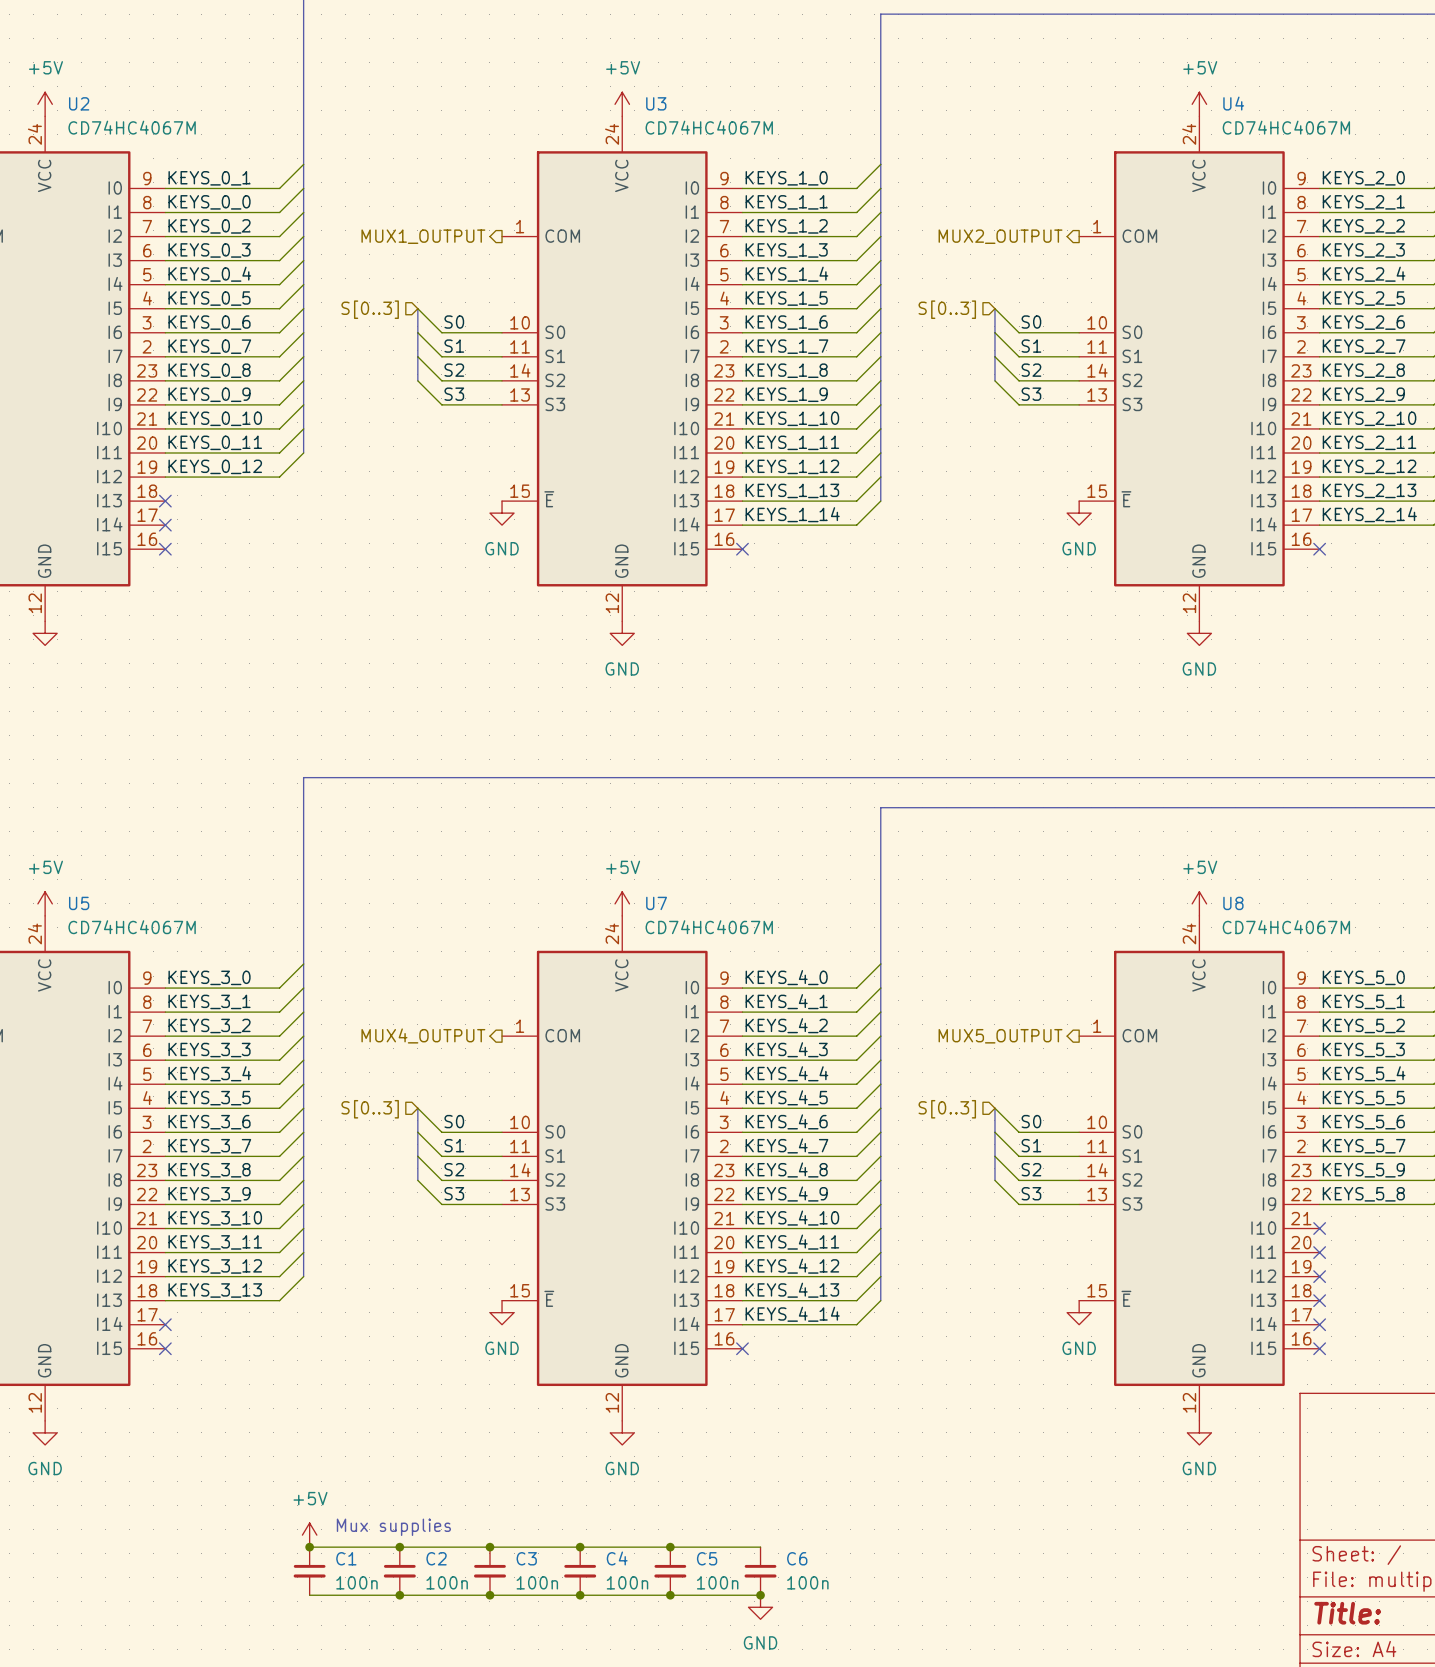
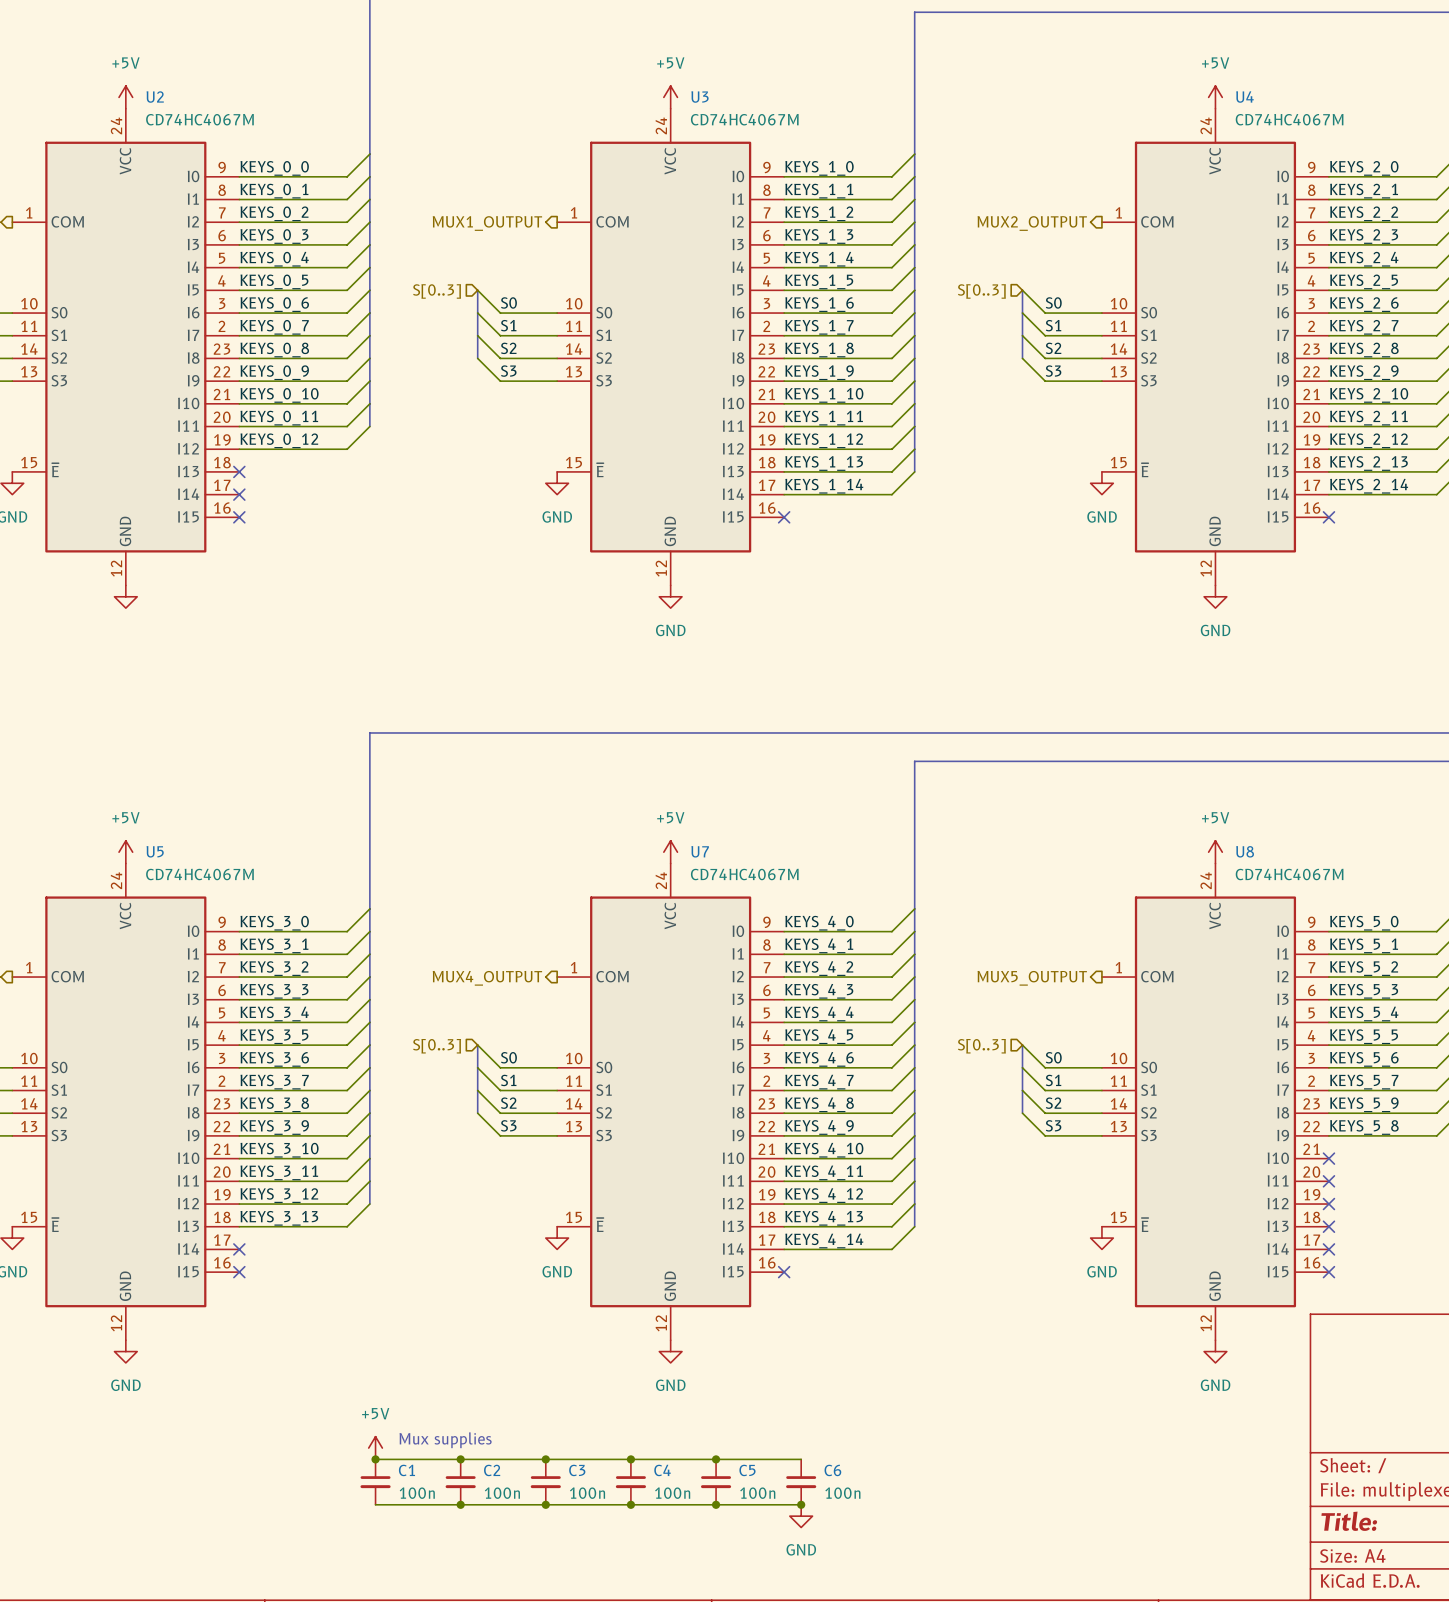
label: KEYS_0_1 (209, 178) -> KEYS_0_0 (274, 168)
label: KEYS_0_0 (209, 202) -> KEYS_0_1 (274, 191)

